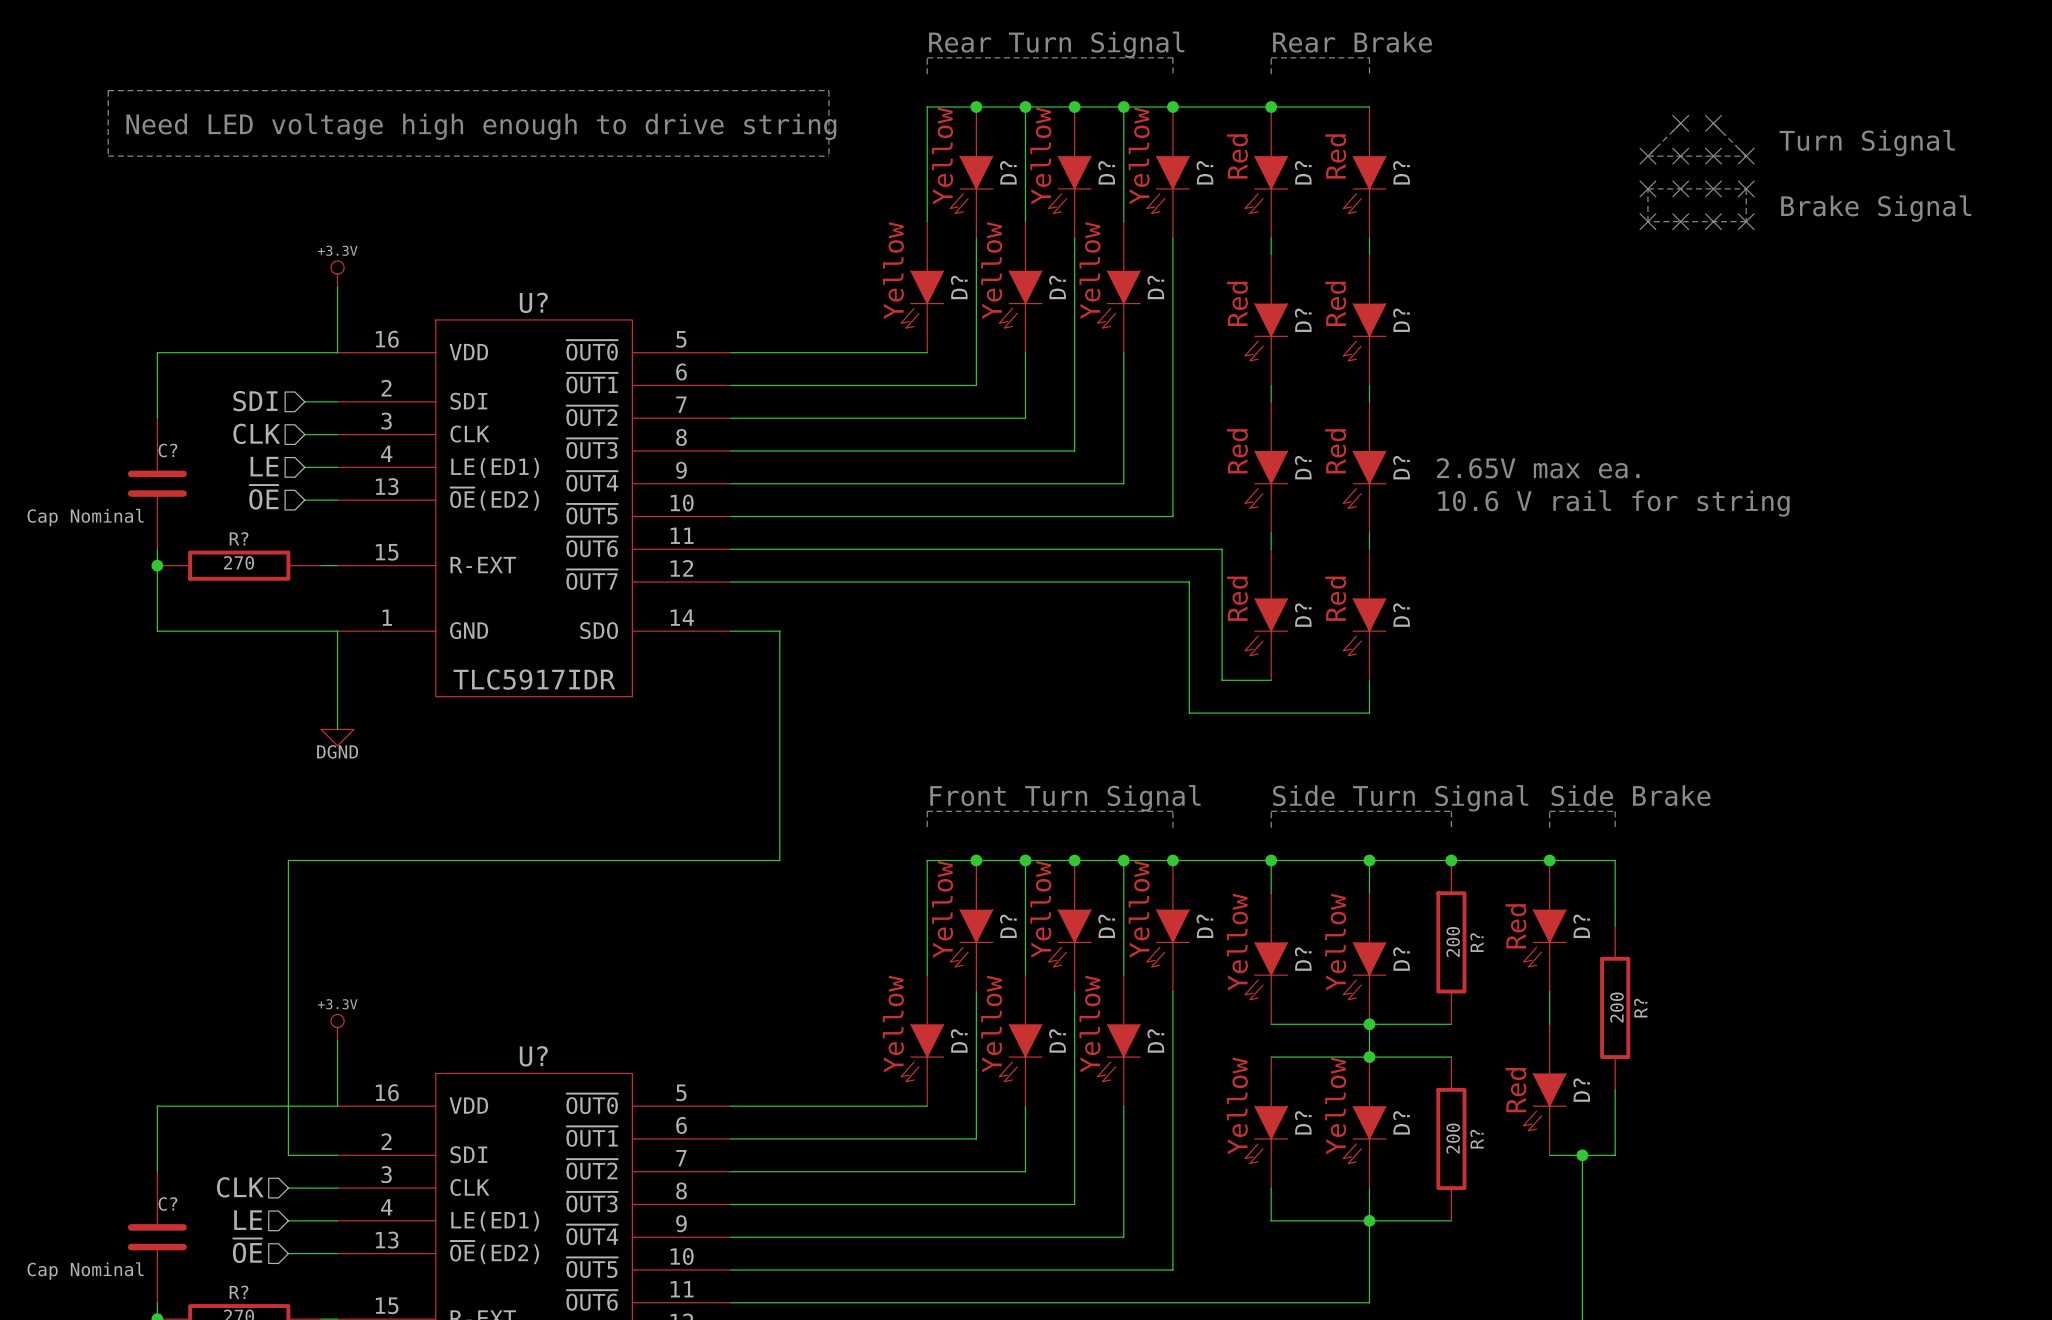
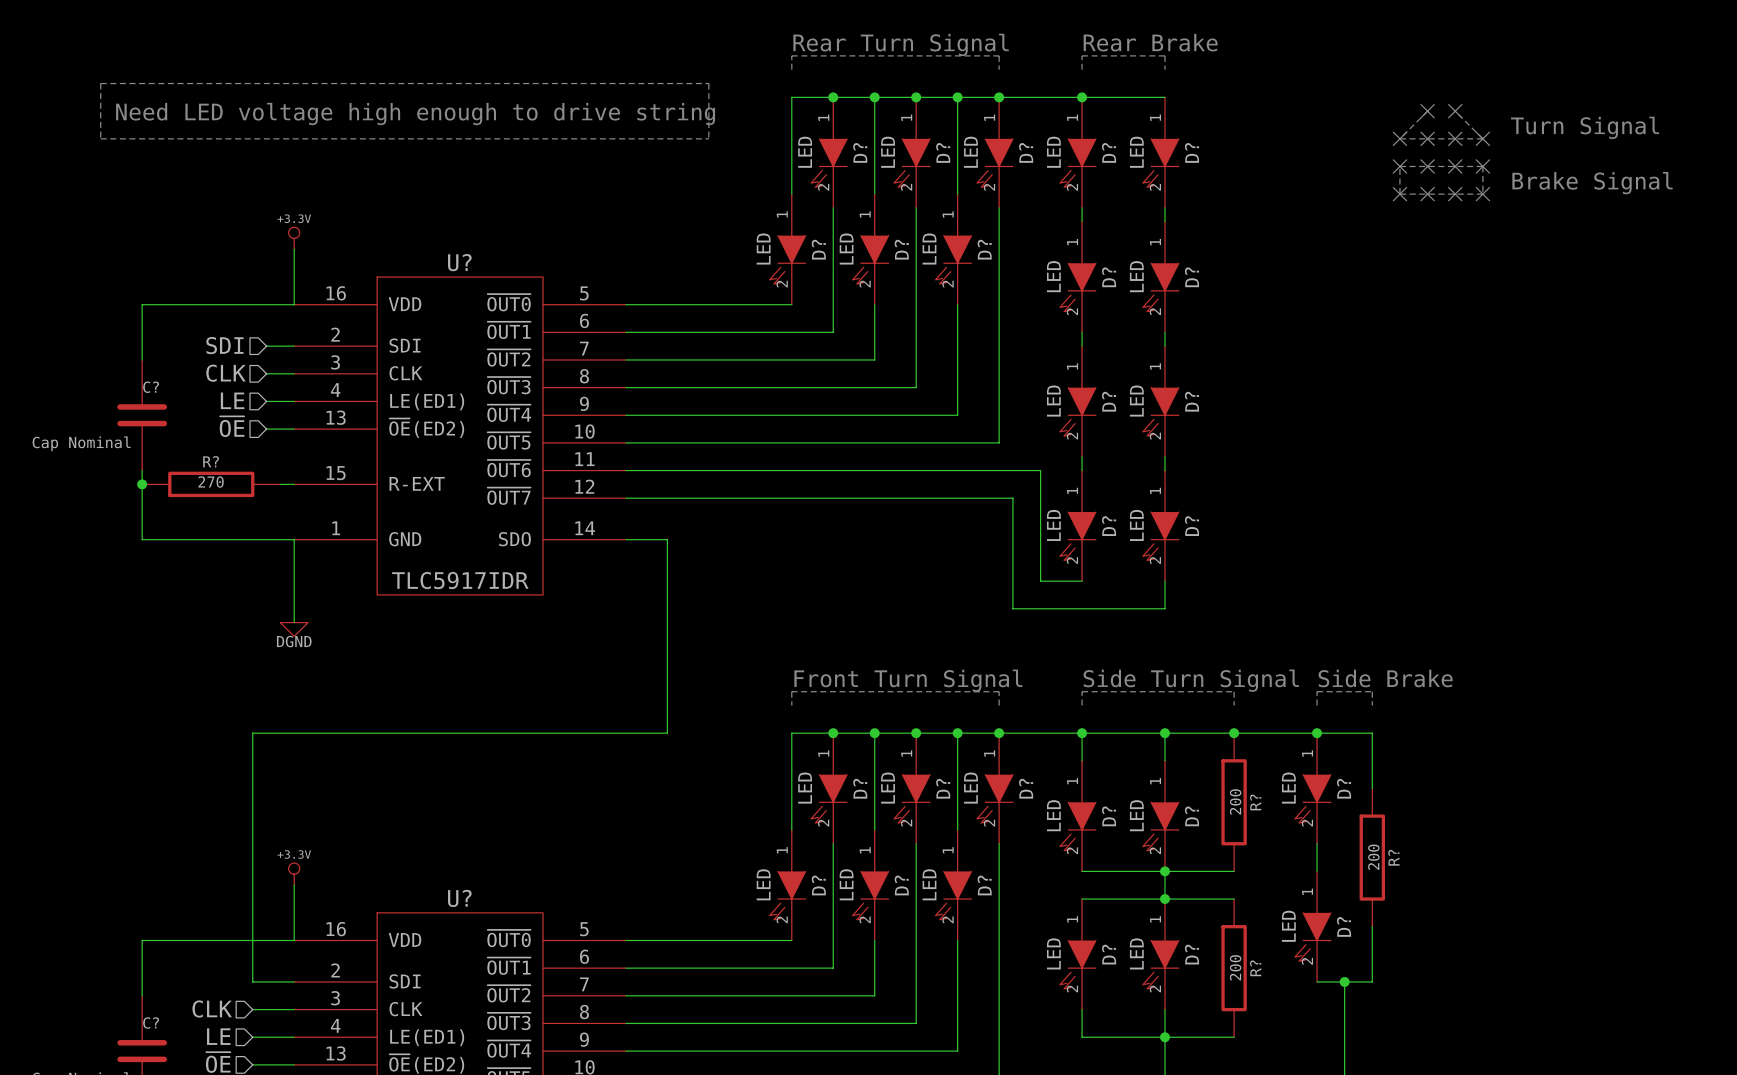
D? pin number: none -> 1 (823, 117)
D? pin number: none -> 1 (906, 117)
D? pin number: none -> 1 (989, 117)
D? pin number: none -> 1 (1072, 117)
D? pin number: none -> 1 (1155, 117)
D? text: Yellow (942, 155) -> none
D? text: Yellow (1040, 155) -> none
D? text: Yellow (1139, 155) -> none
D? text: Red (1237, 156) -> none
D? text: Red (1335, 156) -> none
D? value: none -> LED (805, 152)
D? value: none -> LED (888, 152)
D? value: none -> LED (970, 152)
D? value: none -> LED (1053, 152)
D? value: none -> LED (1136, 152)
D? pin number: none -> 2 (823, 187)
D? pin number: none -> 2 (906, 187)
D? pin number: none -> 2 (989, 187)
D? pin number: none -> 2 (1072, 187)
D? pin number: none -> 2 (1155, 187)
D? pin number: none -> 1 (782, 214)
D? pin number: none -> 1 (865, 214)
D? pin number: none -> 1 (948, 214)
D? text: Yellow (893, 270) -> none
D? text: Yellow (991, 270) -> none
D? text: Yellow (1090, 270) -> none
D? pin number: none -> 1 (1072, 242)
D? pin number: none -> 1 (1155, 242)
D? value: none -> LED (763, 249)
D? value: none -> LED (846, 249)
D? value: none -> LED (929, 249)
D? text: Red (1237, 303) -> none
D? text: Red (1335, 303) -> none
D? value: none -> LED (1053, 276)
D? value: none -> LED (1136, 276)
D? pin number: none -> 2 (782, 284)
D? pin number: none -> 2 (865, 284)
D? pin number: none -> 2 (948, 284)
D? pin number: none -> 2 (1072, 311)
D? pin number: none -> 2 (1155, 311)
D? pin number: none -> 1 (1072, 366)
D? pin number: none -> 1 (1155, 366)
D? text: Red (1237, 451) -> none
D? text: Red (1335, 451) -> none
D? value: none -> LED (1053, 401)
D? value: none -> LED (1136, 401)
text: 2.65V max ea. (1538, 468) -> none
text: 10.6 V rail for string (1613, 503) -> none
D? pin number: none -> 2 (1072, 436)
D? pin number: none -> 2 (1155, 436)
D? pin number: none -> 1 (1072, 490)
D? pin number: none -> 1 (1155, 490)
D? text: Red (1237, 598) -> none
D? text: Red (1335, 598) -> none
D? value: none -> LED (1053, 525)
D? value: none -> LED (1136, 525)
D? pin number: none -> 2 (1072, 560)
D? pin number: none -> 2 (1155, 560)
D? pin number: none -> 1 (823, 753)
D? pin number: none -> 1 (906, 753)
D? pin number: none -> 1 (989, 753)
D? pin number: none -> 1 (1307, 753)
D? text: Yellow (942, 909) -> none
D? text: Yellow (1040, 909) -> none
D? text: Yellow (1139, 909) -> none
D? pin number: none -> 1 (1072, 781)
D? pin number: none -> 1 (1155, 781)
D? value: none -> LED (805, 788)
D? value: none -> LED (888, 788)
D? value: none -> LED (970, 788)
D? value: none -> LED (1288, 788)
D? text: Red (1515, 926) -> none
D? text: Yellow (1237, 942) -> none
D? text: Yellow (1335, 942) -> none
D? value: none -> LED (1053, 815)
D? value: none -> LED (1136, 815)
D? pin number: none -> 2 (823, 823)
D? pin number: none -> 2 (906, 823)
D? pin number: none -> 2 (989, 823)
D? pin number: none -> 2 (1307, 823)
D? pin number: none -> 1 (782, 850)
D? pin number: none -> 1 (865, 850)
D? pin number: none -> 1 (948, 850)
D? pin number: none -> 2 (1072, 850)
D? pin number: none -> 2 (1155, 850)
D? text: Yellow (893, 1024) -> none
D? text: Yellow (991, 1024) -> none
D? text: Yellow (1090, 1024) -> none
D? value: none -> LED (763, 884)
D? value: none -> LED (846, 884)
D? value: none -> LED (929, 884)
D? pin number: none -> 1 (1307, 891)
D? pin number: none -> 2 (782, 919)
D? pin number: none -> 2 (865, 919)
D? pin number: none -> 2 (948, 919)
D? pin number: none -> 1 (1072, 919)
D? pin number: none -> 1 (1155, 919)
D? value: none -> LED (1288, 926)
D? text: Red (1515, 1090) -> none
D? text: Yellow (1237, 1105) -> none
D? text: Yellow (1335, 1105) -> none
D? value: none -> LED (1053, 953)
D? value: none -> LED (1136, 953)
D? pin number: none -> 2 (1307, 961)
D? pin number: none -> 2 (1072, 988)
D? pin number: none -> 2 (1155, 988)

